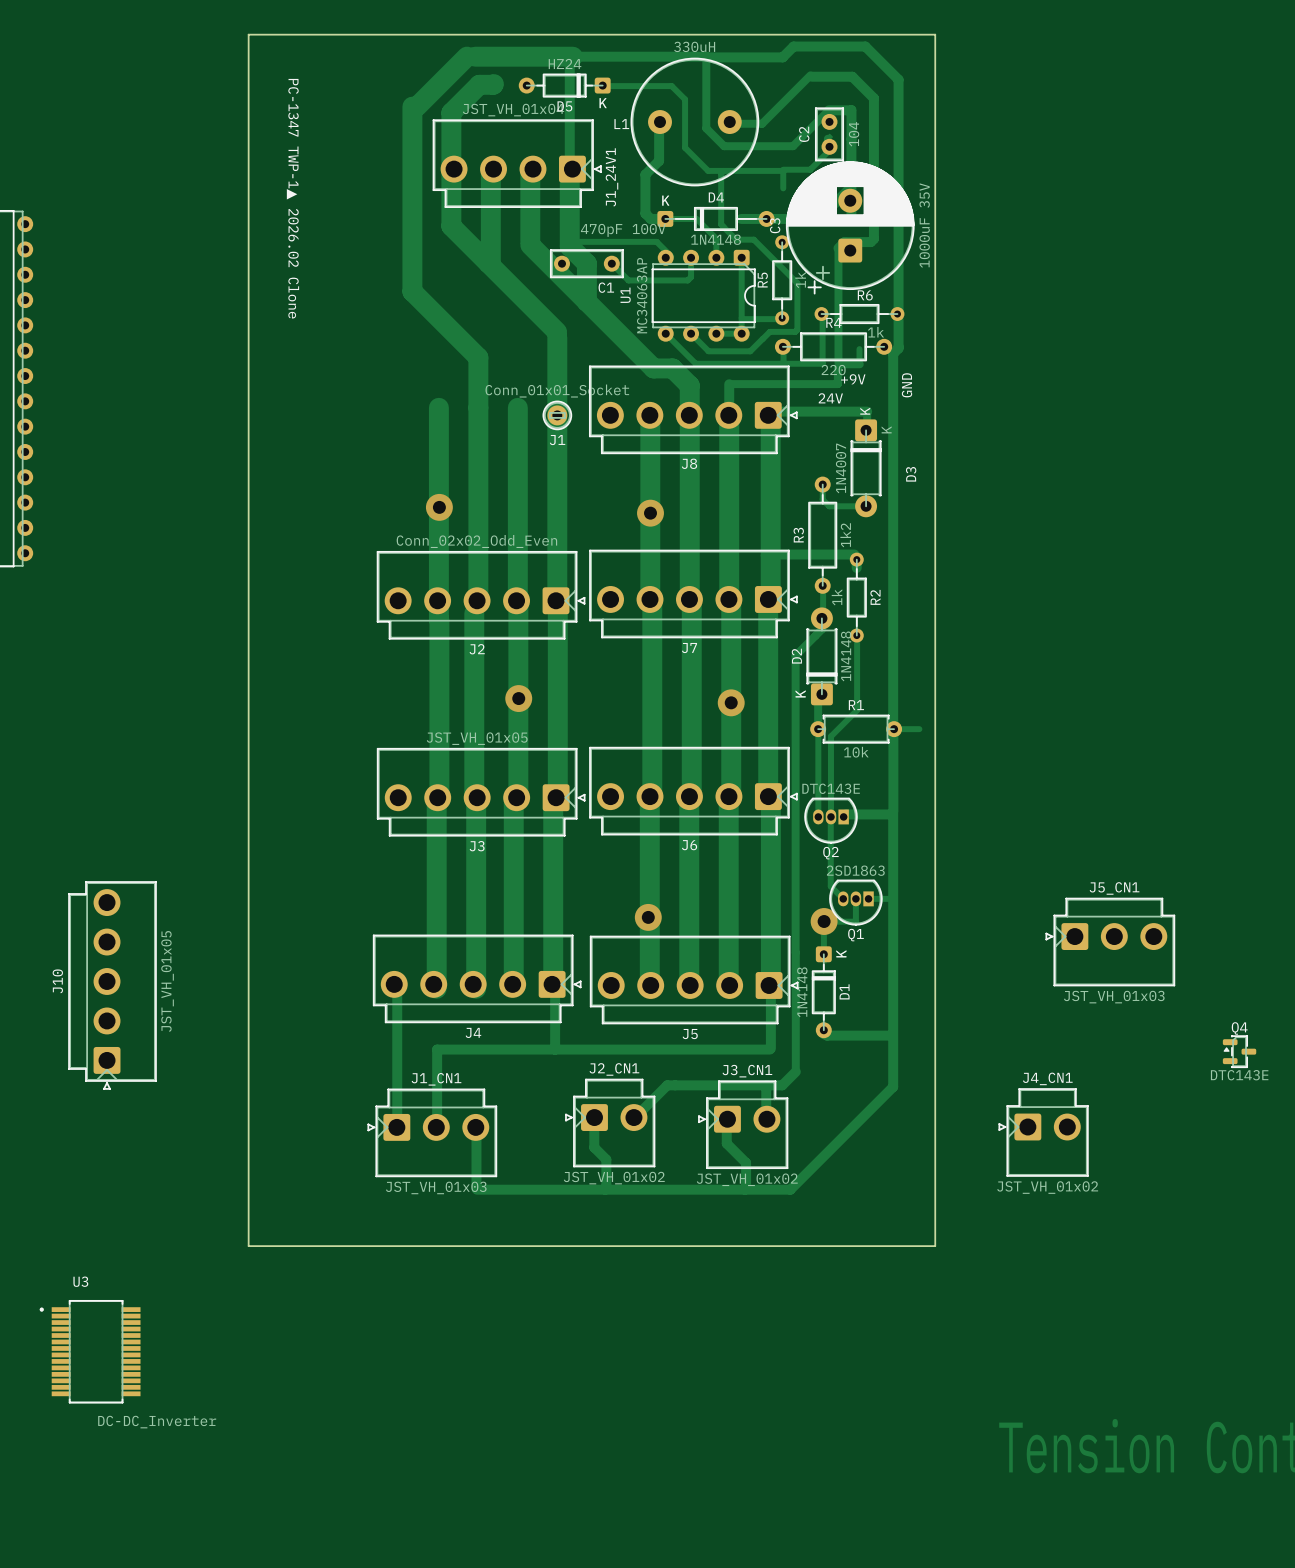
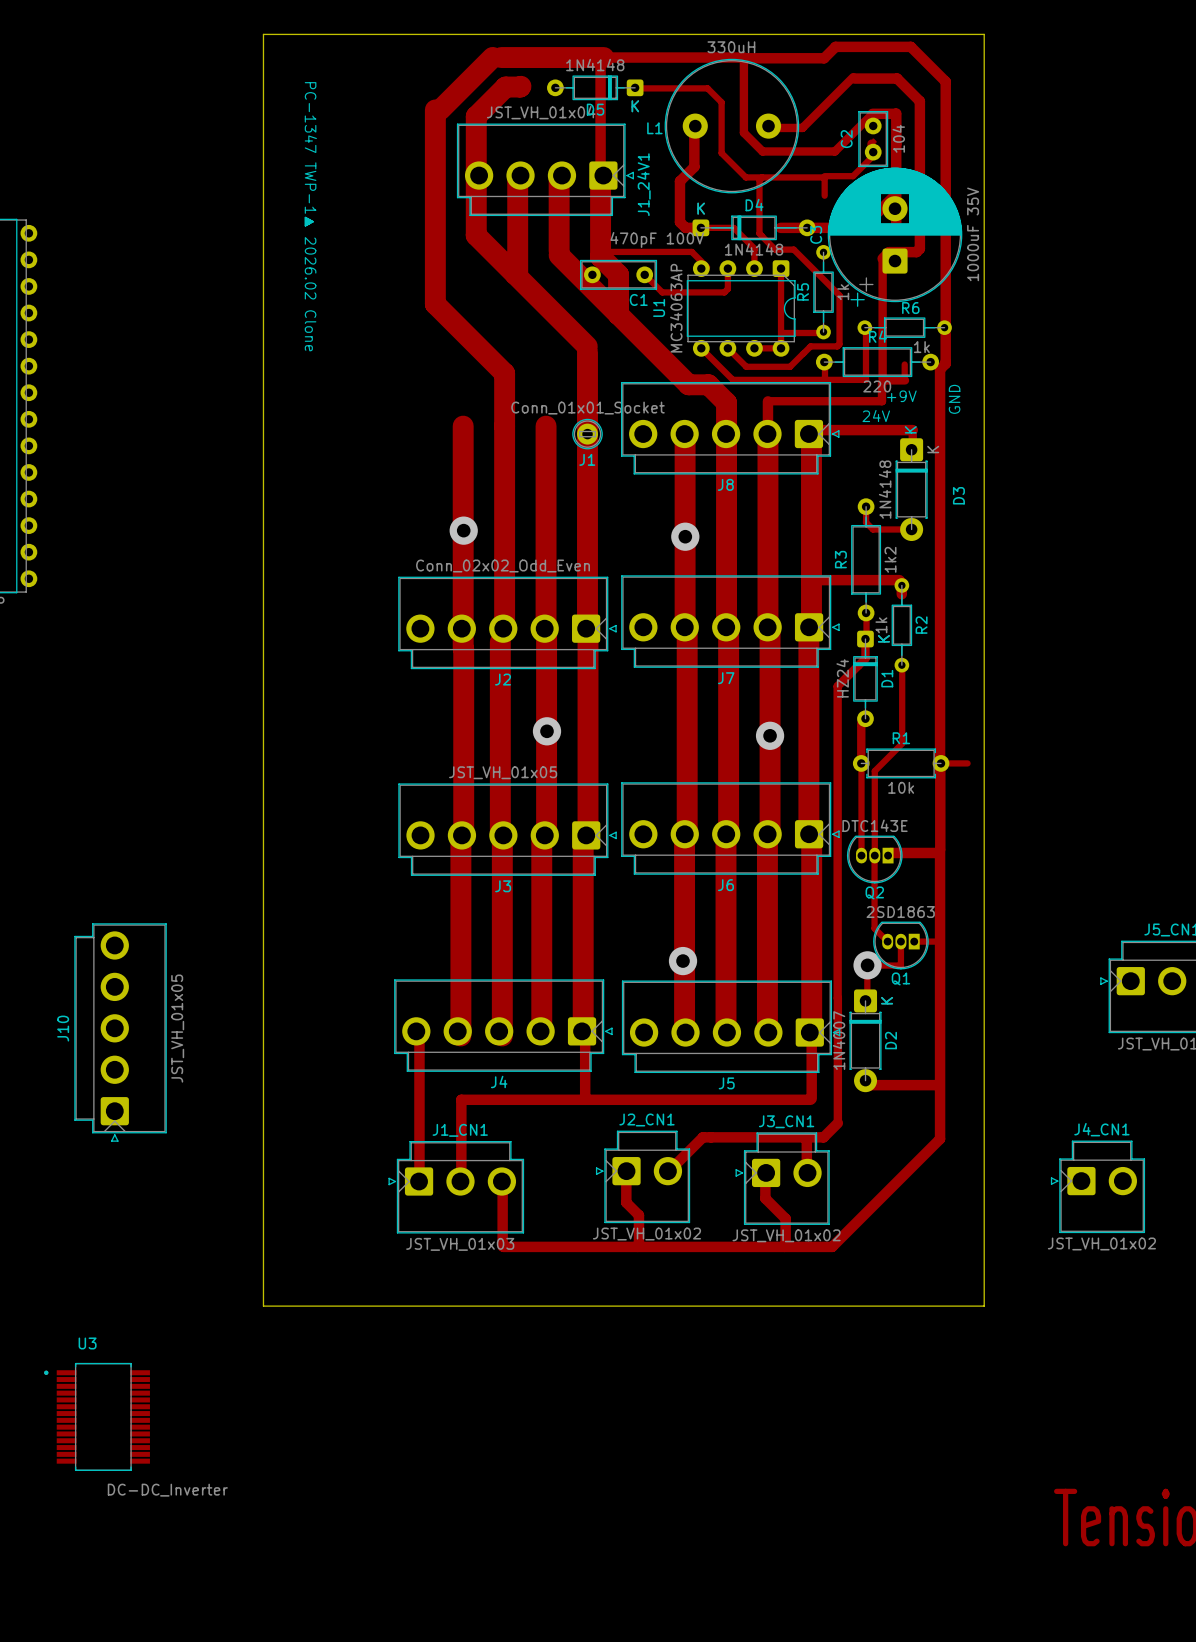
D5 value: HZ24 (565, 63) -> 1N4148 (595, 65)
D3 value: 1N4007 (841, 468) -> 1N4148 (885, 489)
D2 rotation: 0° (821, 656) -> 180° (865, 1040)
D2 position: (821, 656) -> (865, 1040)
D2 value: 1N4148 (846, 656) -> 1N4007 (839, 1040)
D1 value: 1N4148 (802, 992) -> HZ24 (842, 678)
D1 position: (823, 992) -> (865, 678)

